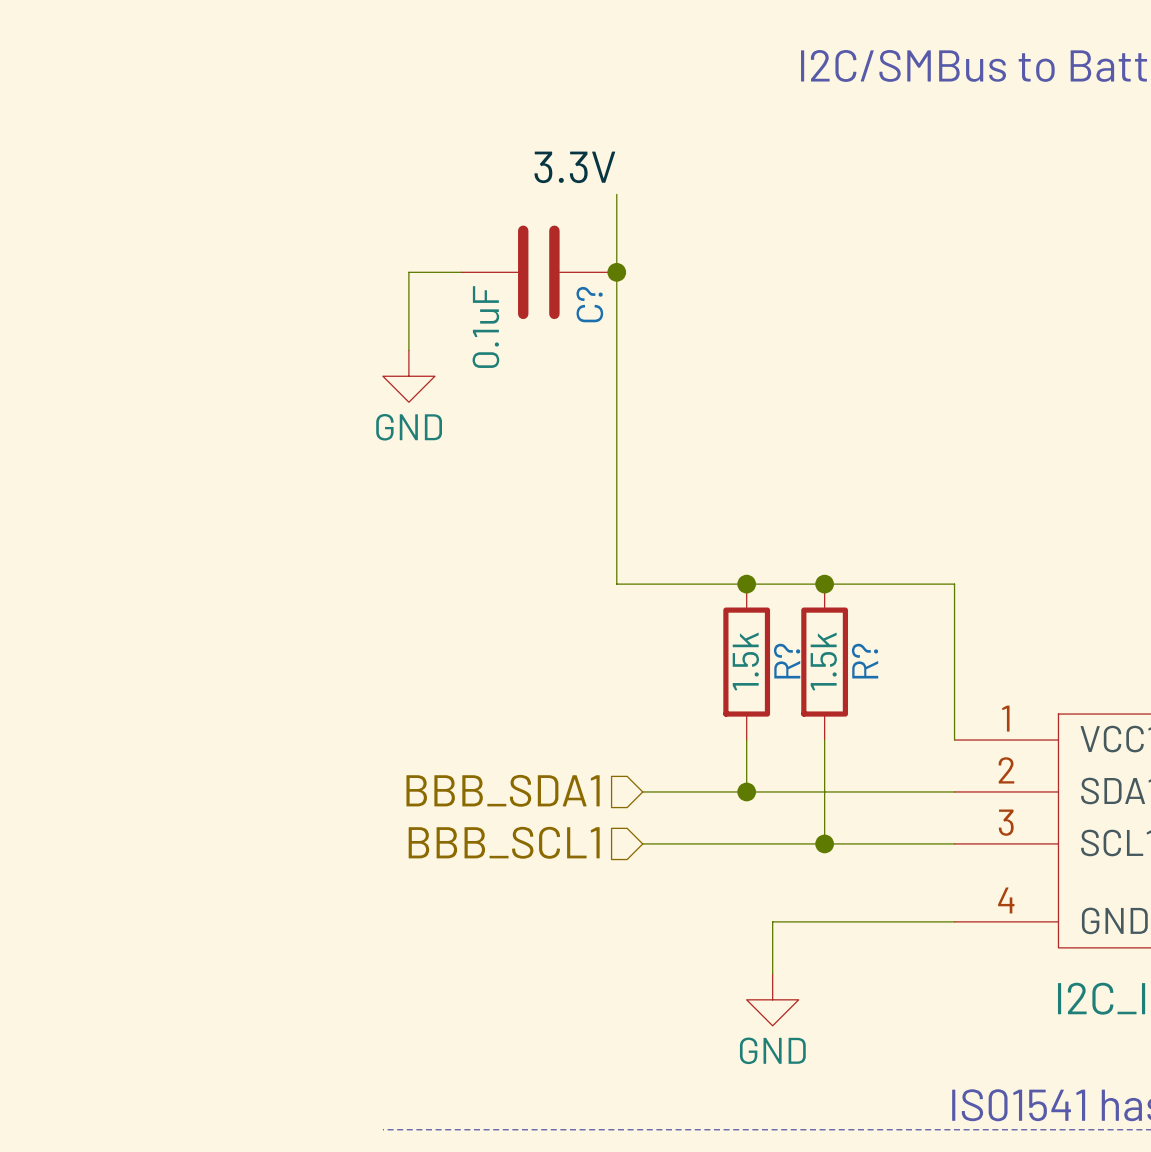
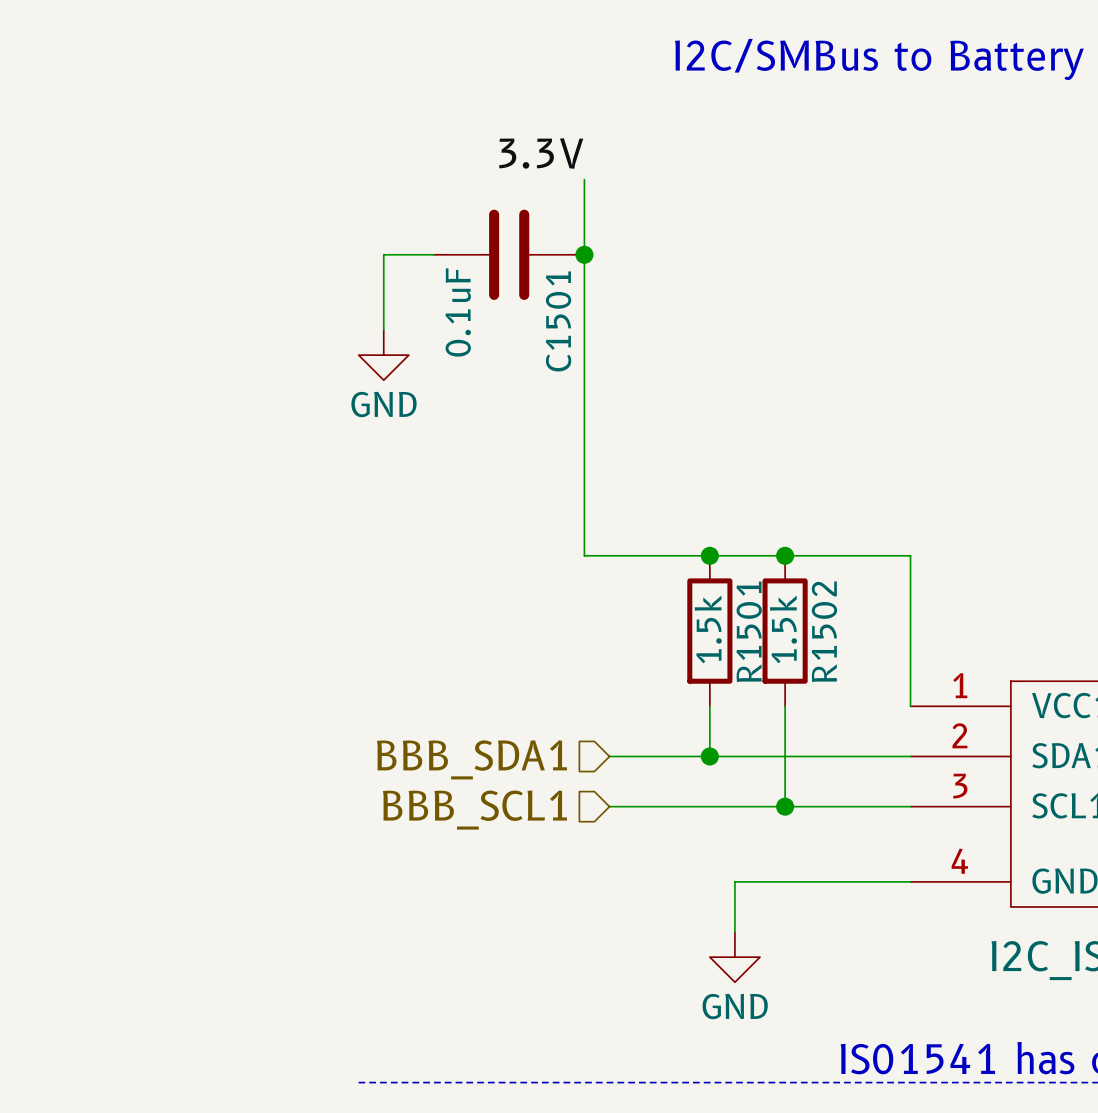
C? name: C? (589, 304) -> C1501 (558, 321)
R? name: R? (787, 661) -> R1501 (749, 631)
R? name: R? (865, 661) -> R1502 (824, 631)

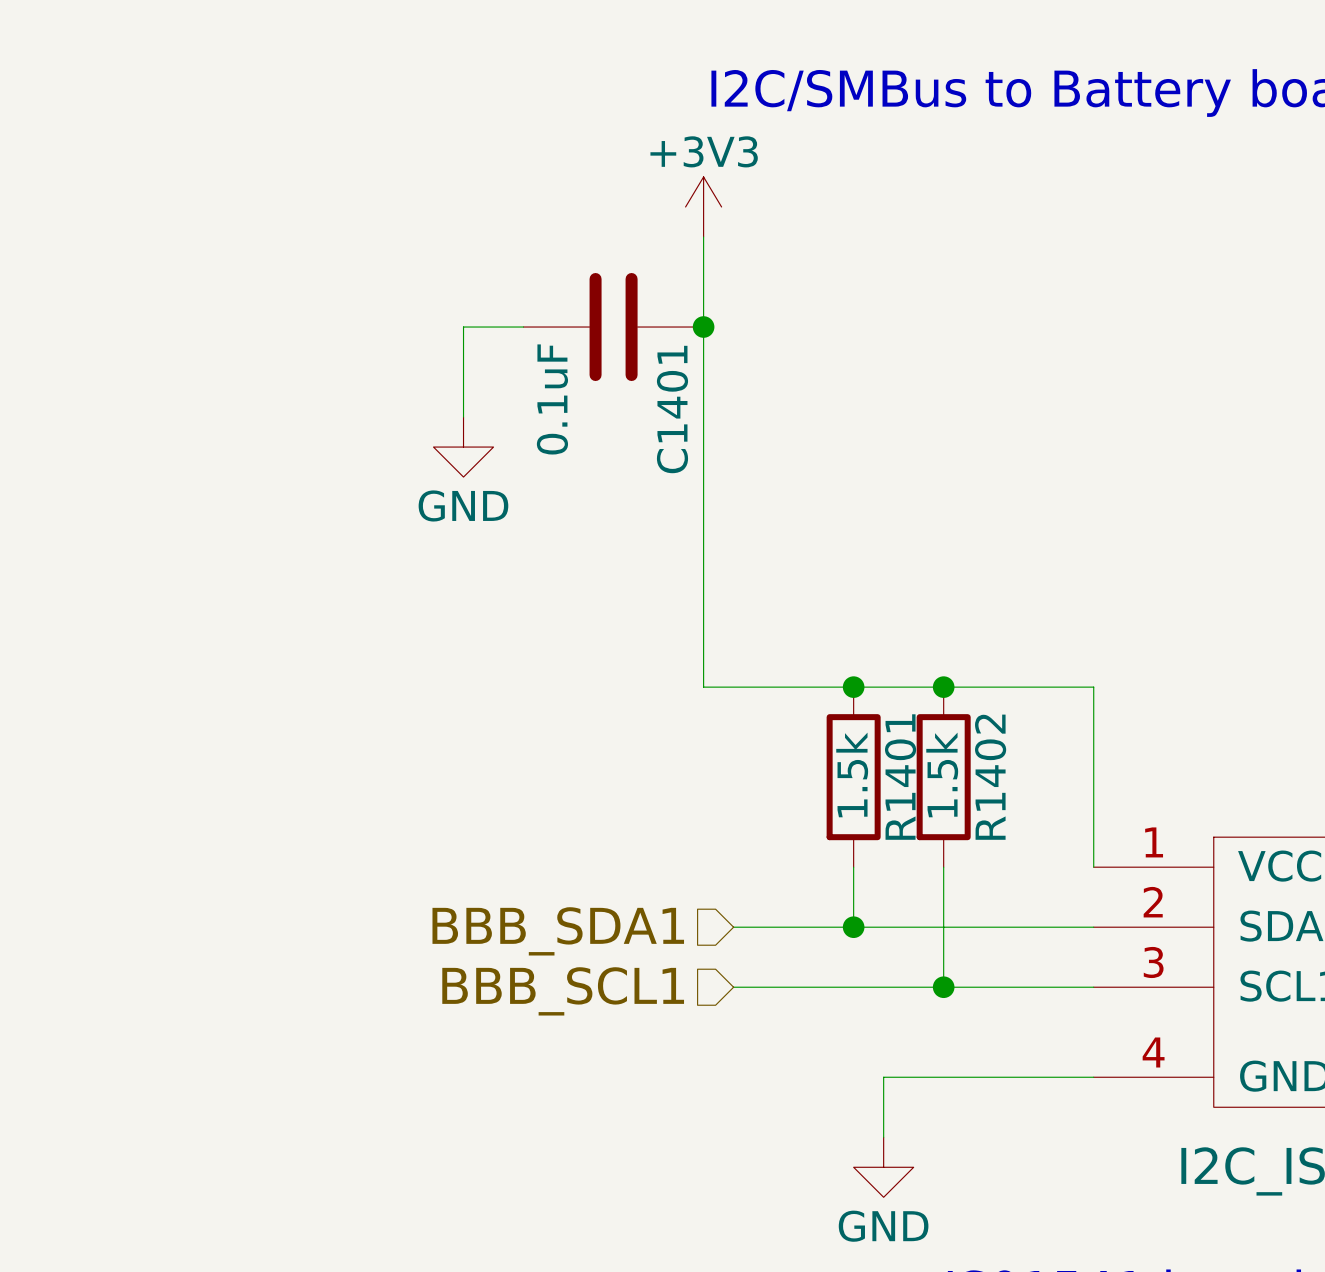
label: 3.3V (541, 153) -> none
power symbol: none -> +3V3 (703, 206)
C1501 name: C1501 (558, 321) -> C1401 (672, 409)
R1501 name: R1501 (749, 631) -> R1401 (900, 777)
R1502 name: R1502 (824, 631) -> R1402 (990, 777)

